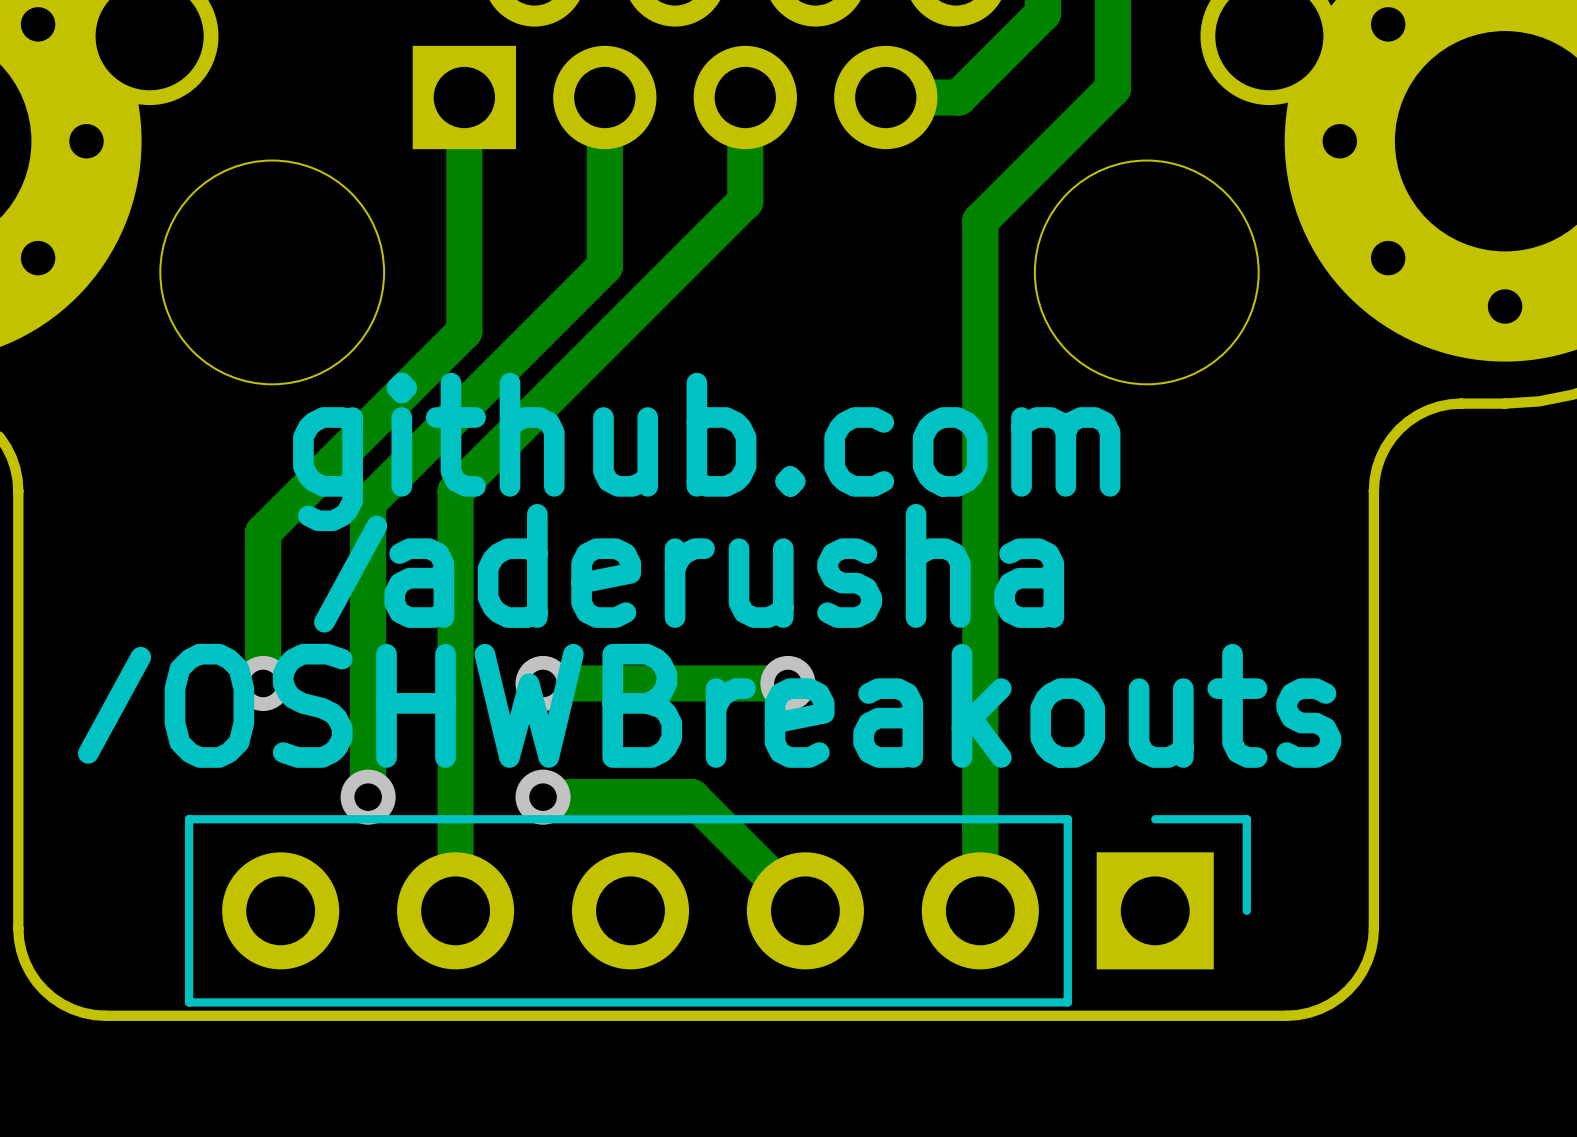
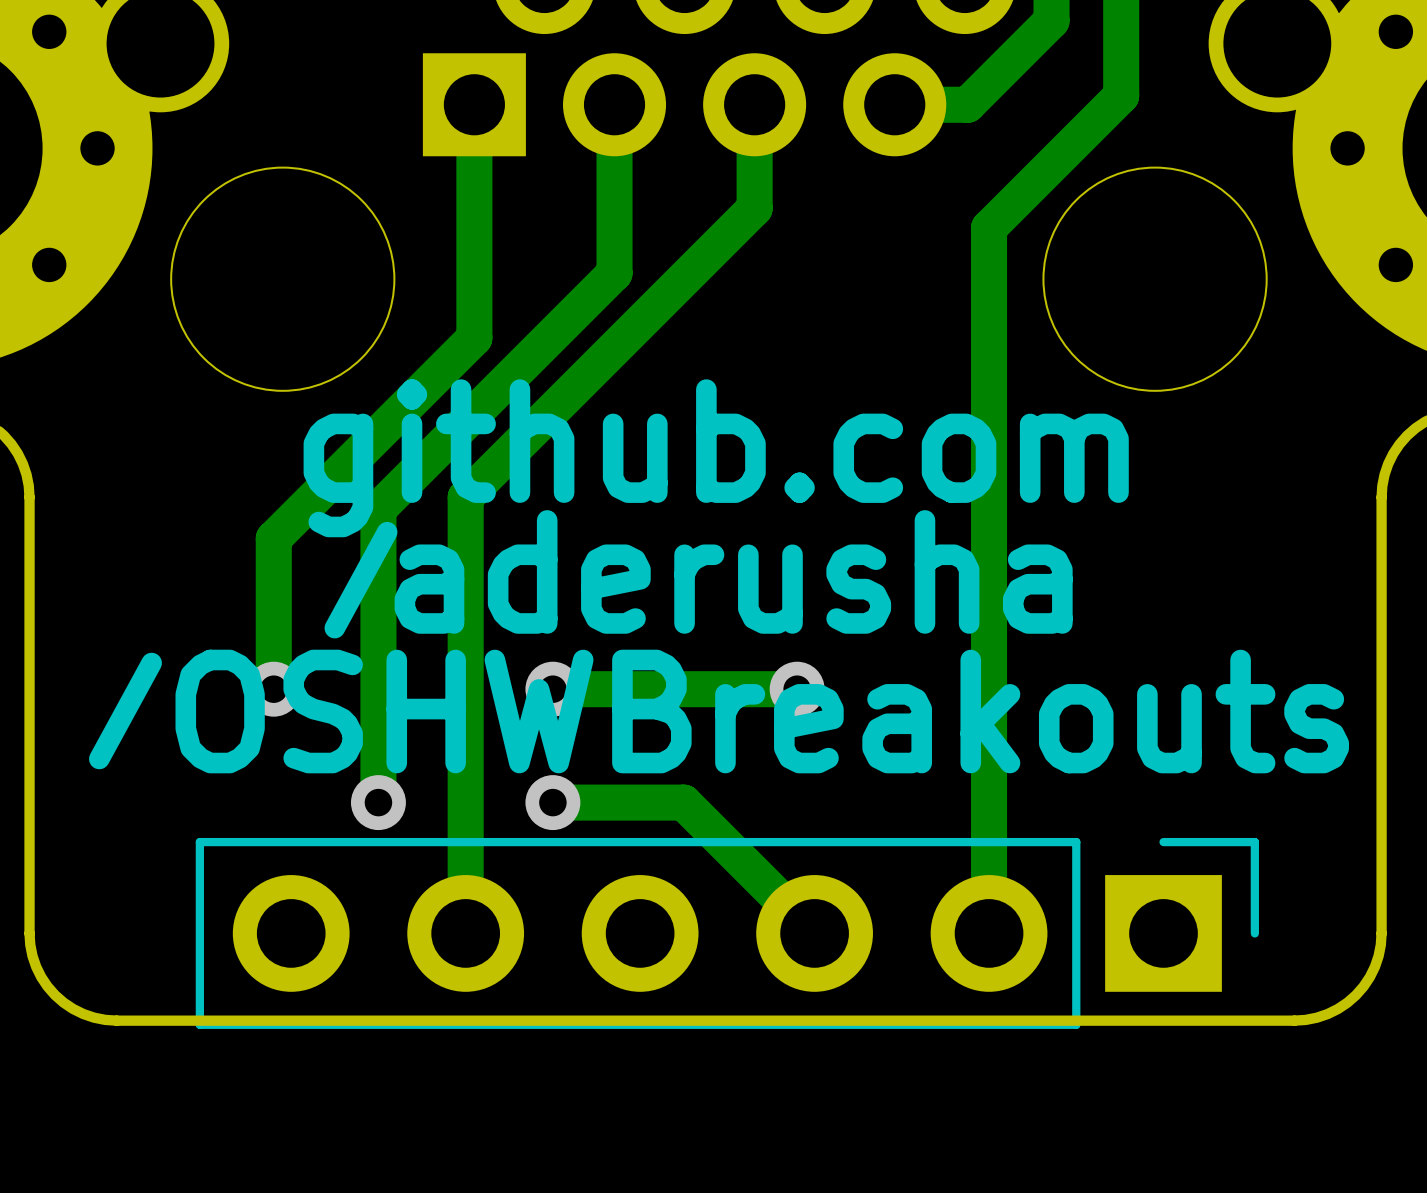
track: (674, 797) (691, 797) (805, 910) -> (683, 802) (814, 933)
part position: (717, 910) -> (727, 933)

